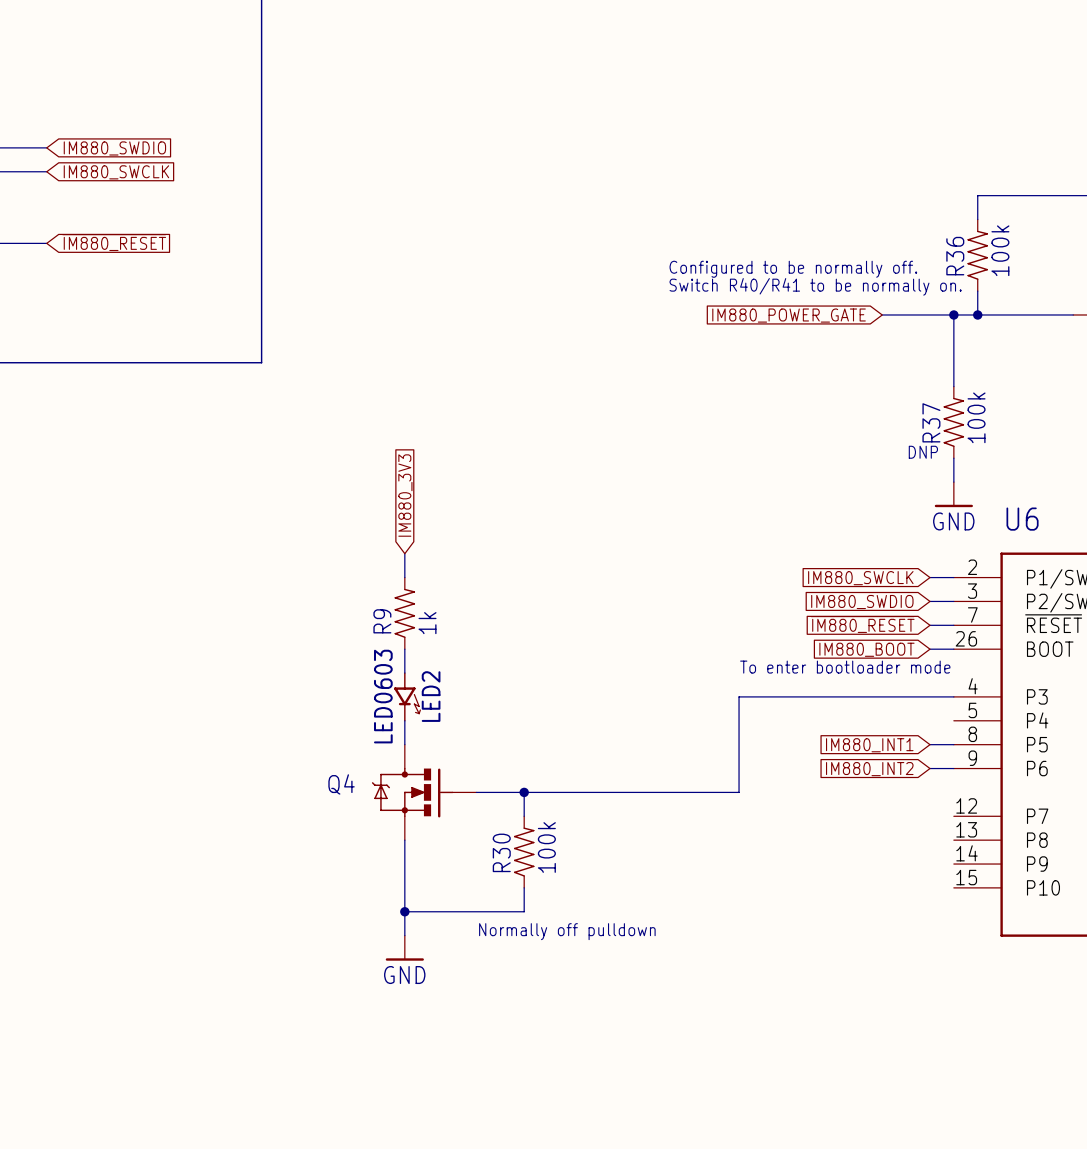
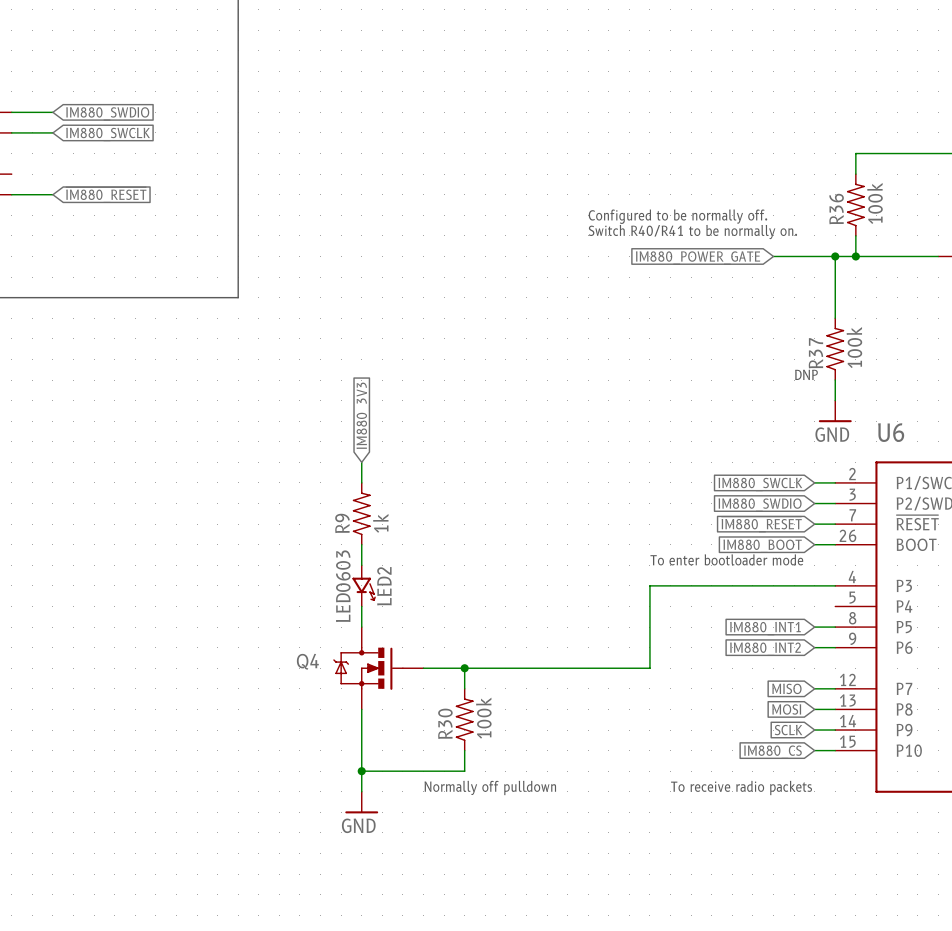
global label: none -> MISO (786, 688)
wire: none -> (814, 688) (835, 688)
global label: none -> MOSI (786, 709)
wire: none -> (814, 709) (835, 709)
global label: none -> SCLK (788, 730)
wire: none -> (814, 730) (835, 730)
wire: none -> (814, 750) (835, 750)
global label: none -> IM880_CS (772, 752)
text: none -> To receive radio packets (741, 787)

